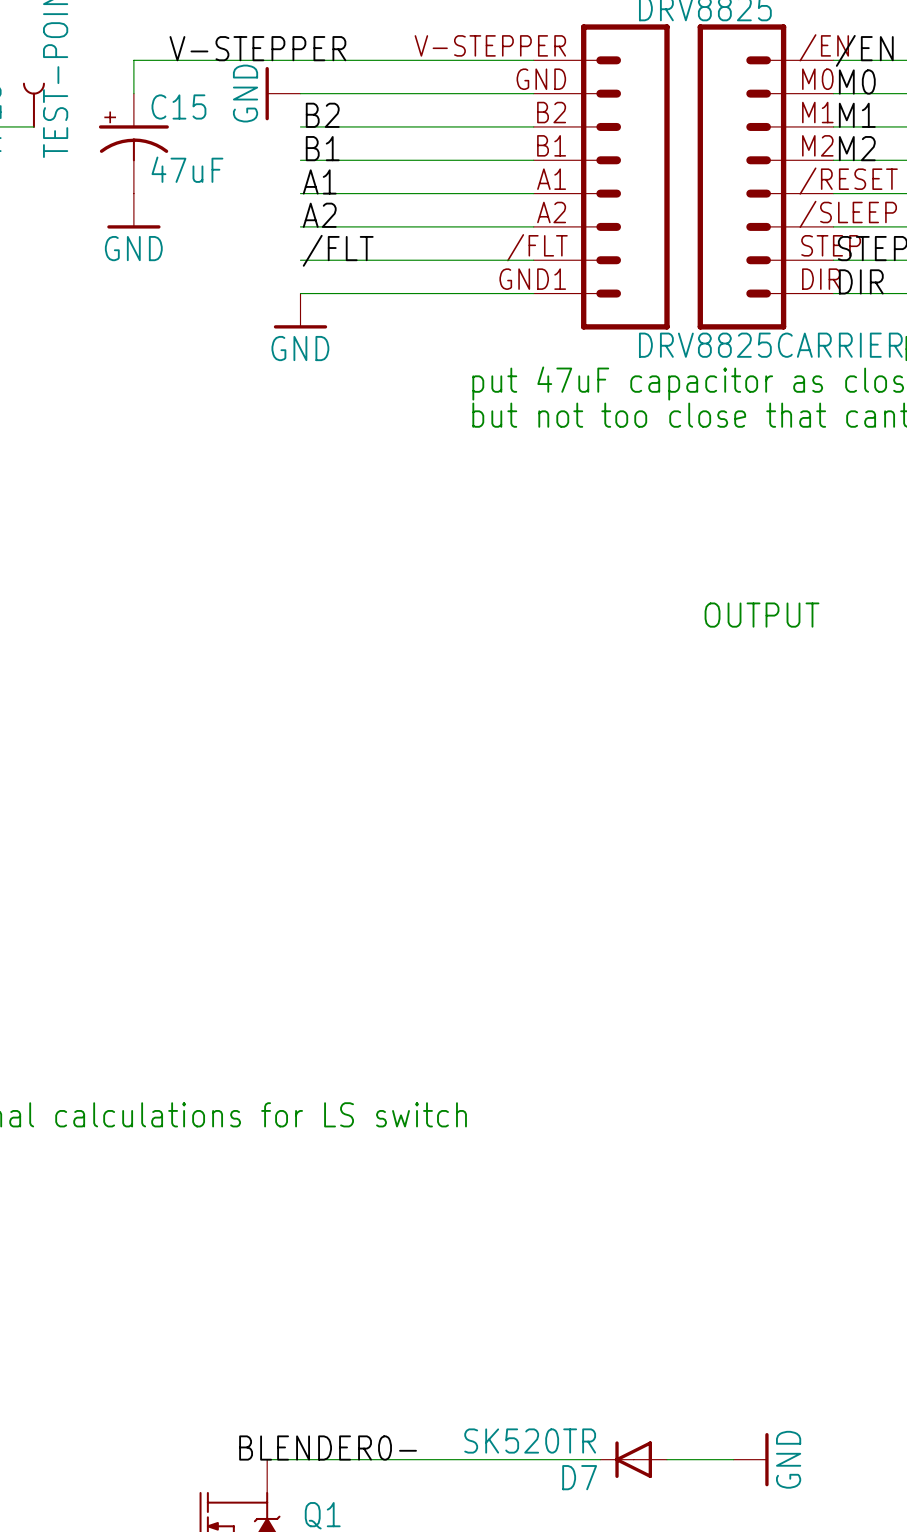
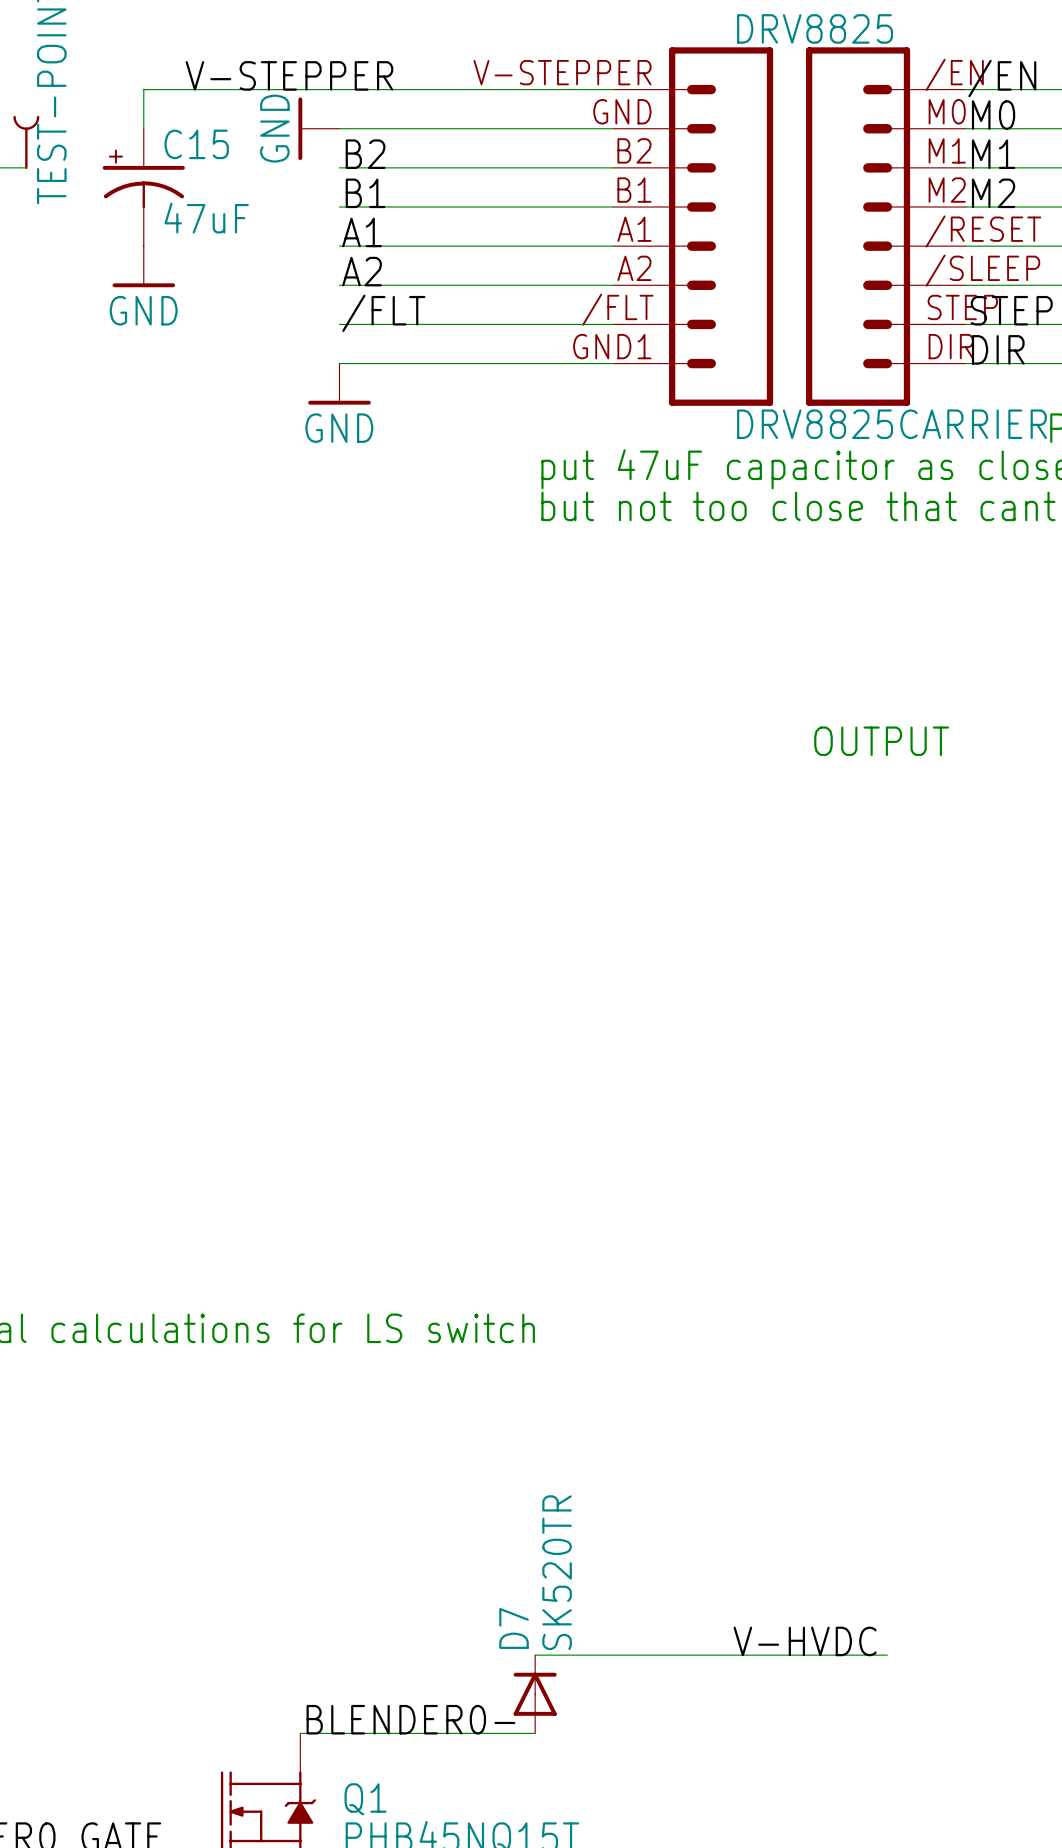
label: none -> V-HVDC (805, 1641)
wire: none -> (535, 1655) (887, 1655)
label position: BLENDER0- (328, 1448) -> BLENDER0- (410, 1719)
wire: (467, 1459) (600, 1459) -> none
D7 rotation: 0° (633, 1459) -> 90° clockwise (535, 1694)
D7 position: (633, 1459) -> (535, 1694)
wire: (666, 1459) (733, 1459) -> none
power symbol: GND (751, 1459) -> none

